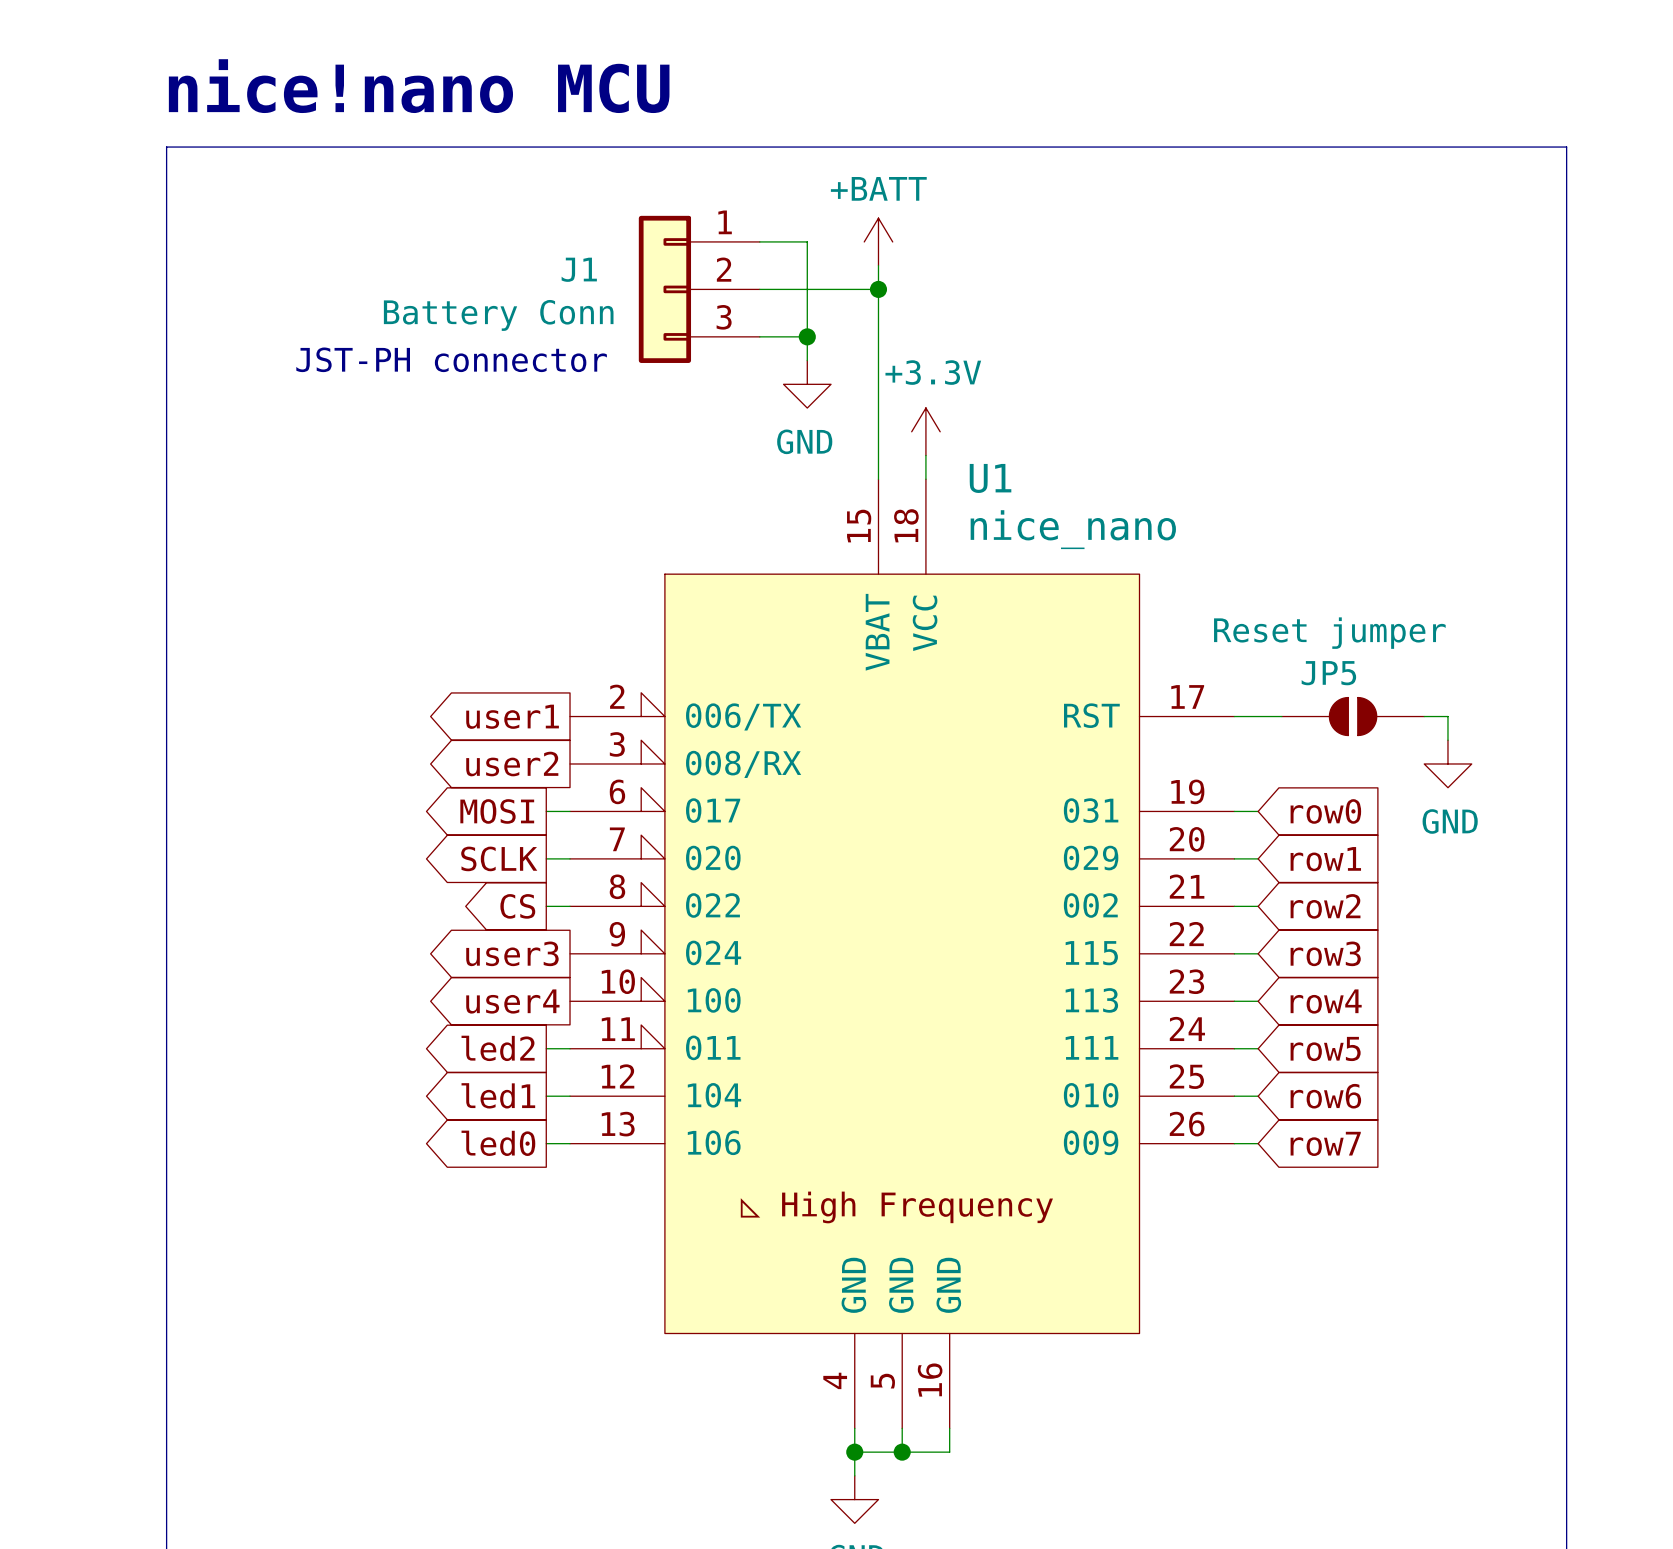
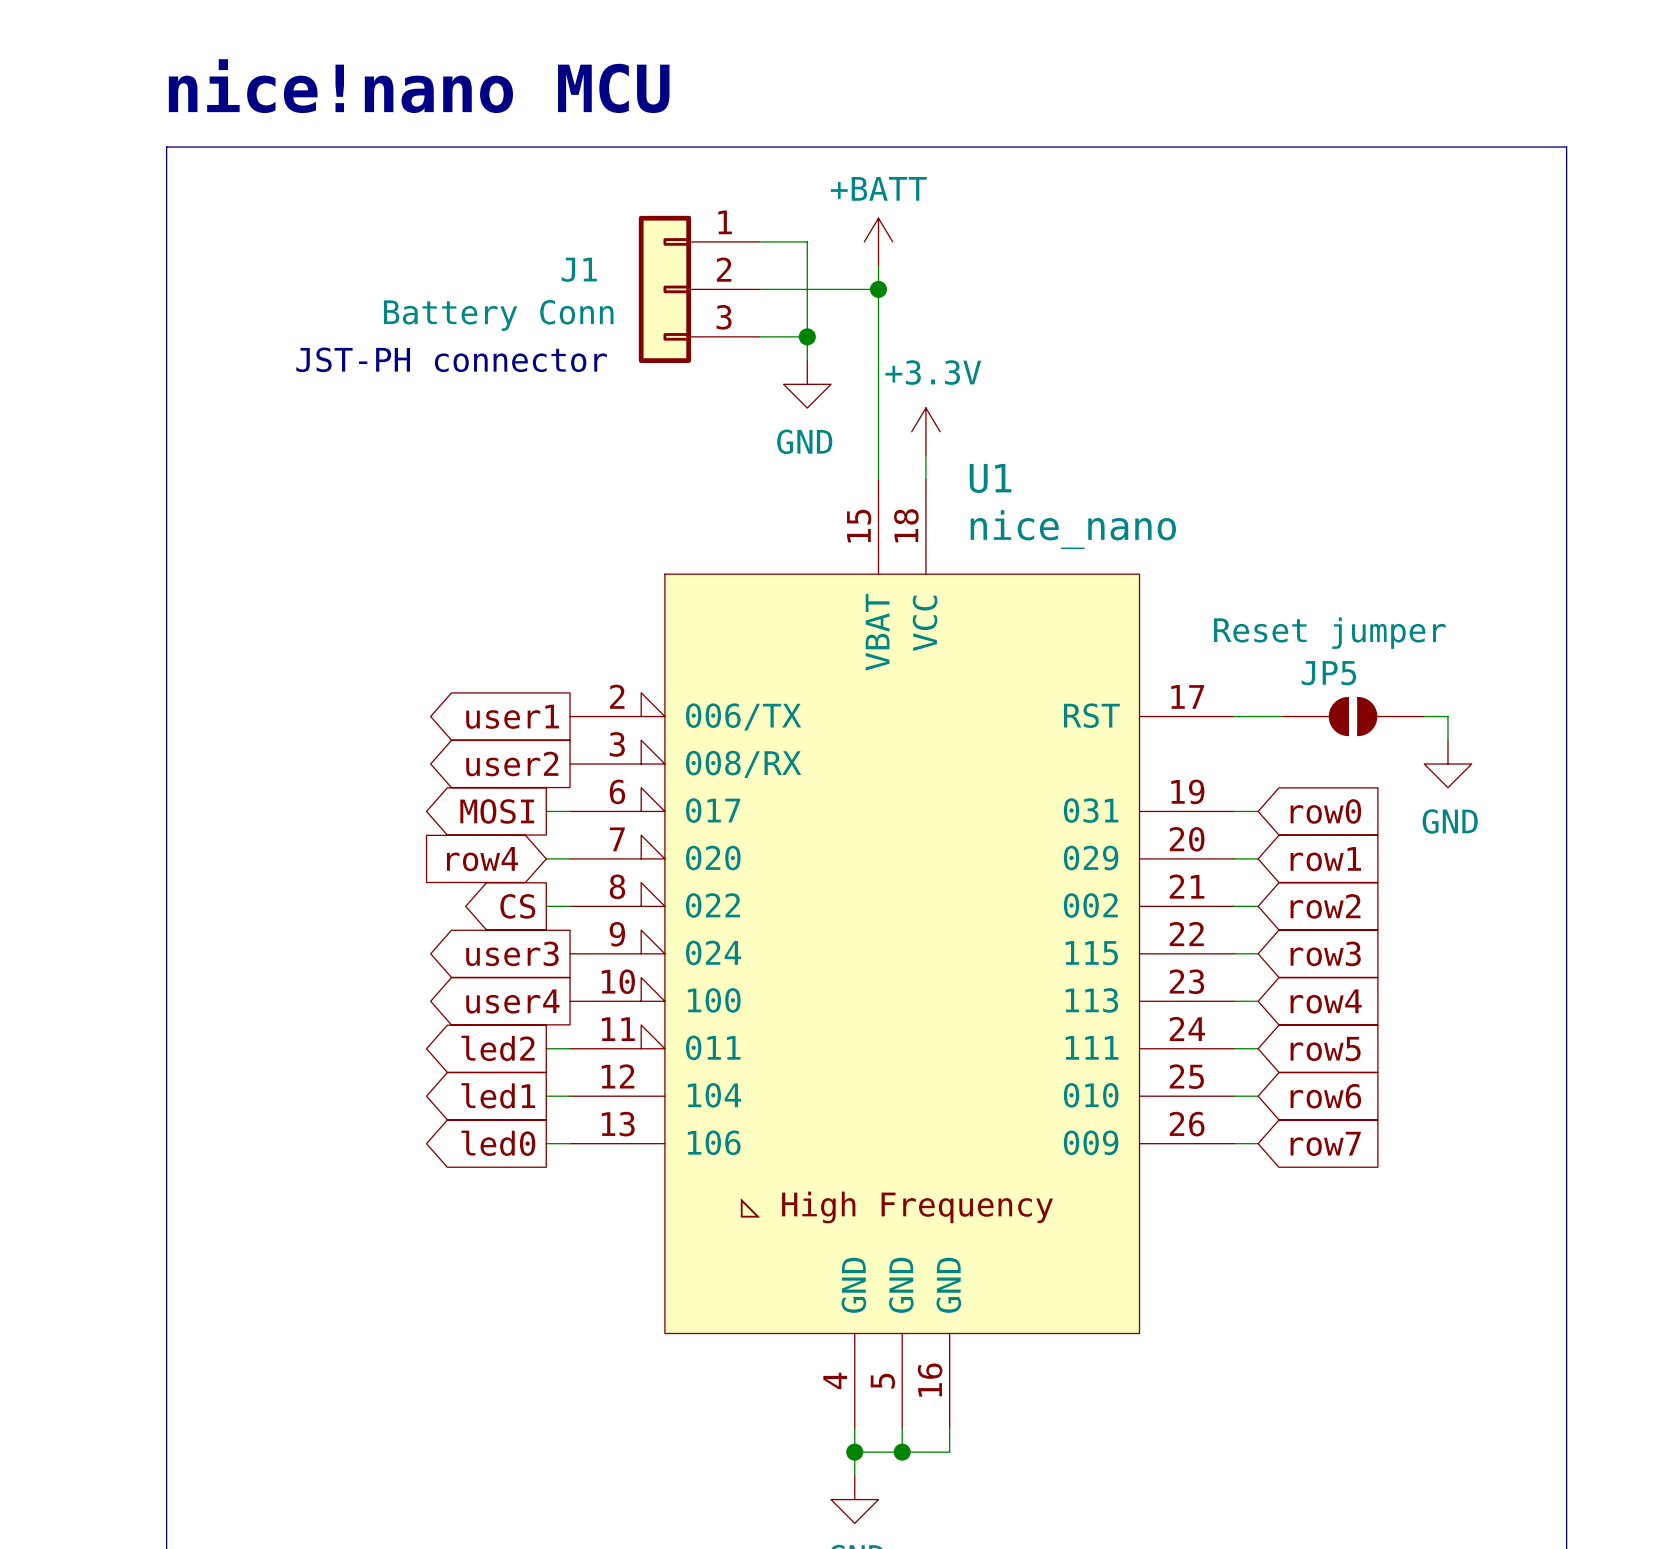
global label shape: output (499, 858) -> input (482, 859)
global label: SCLK (499, 858) -> row4 (482, 859)

